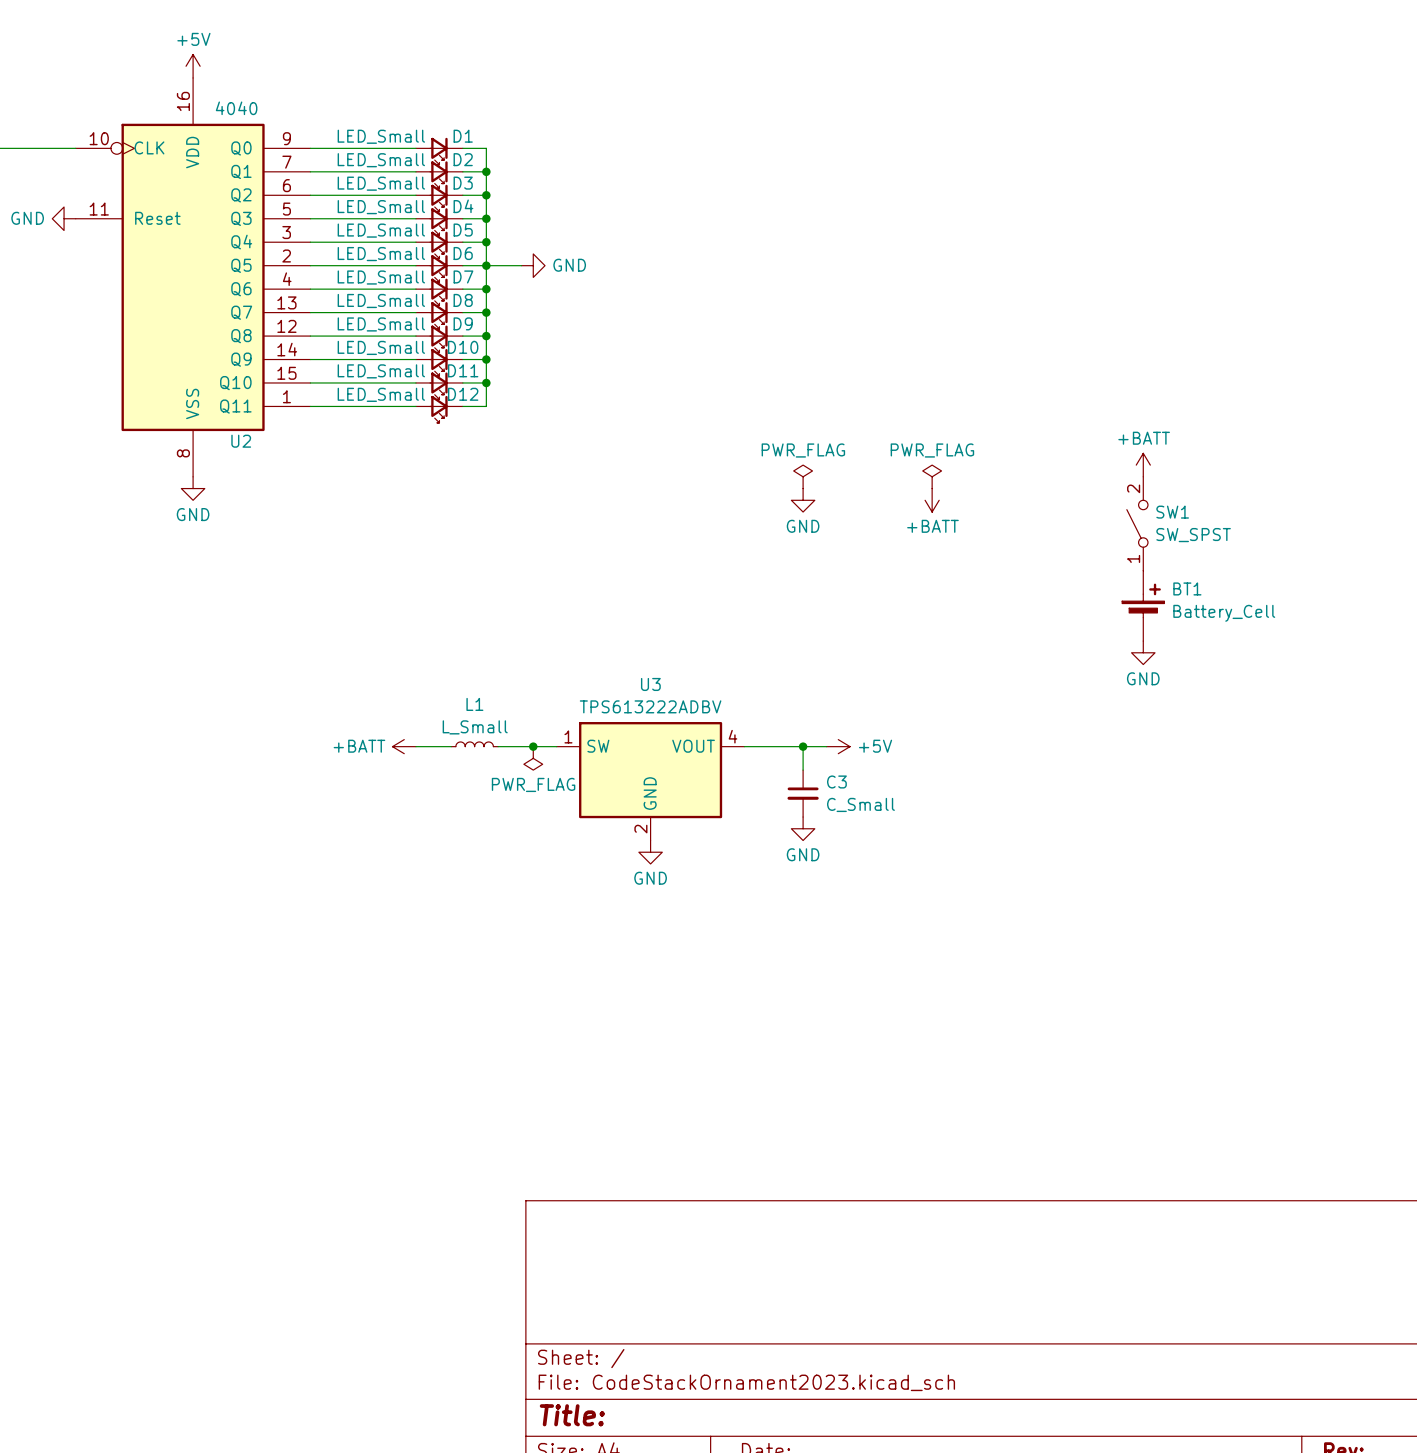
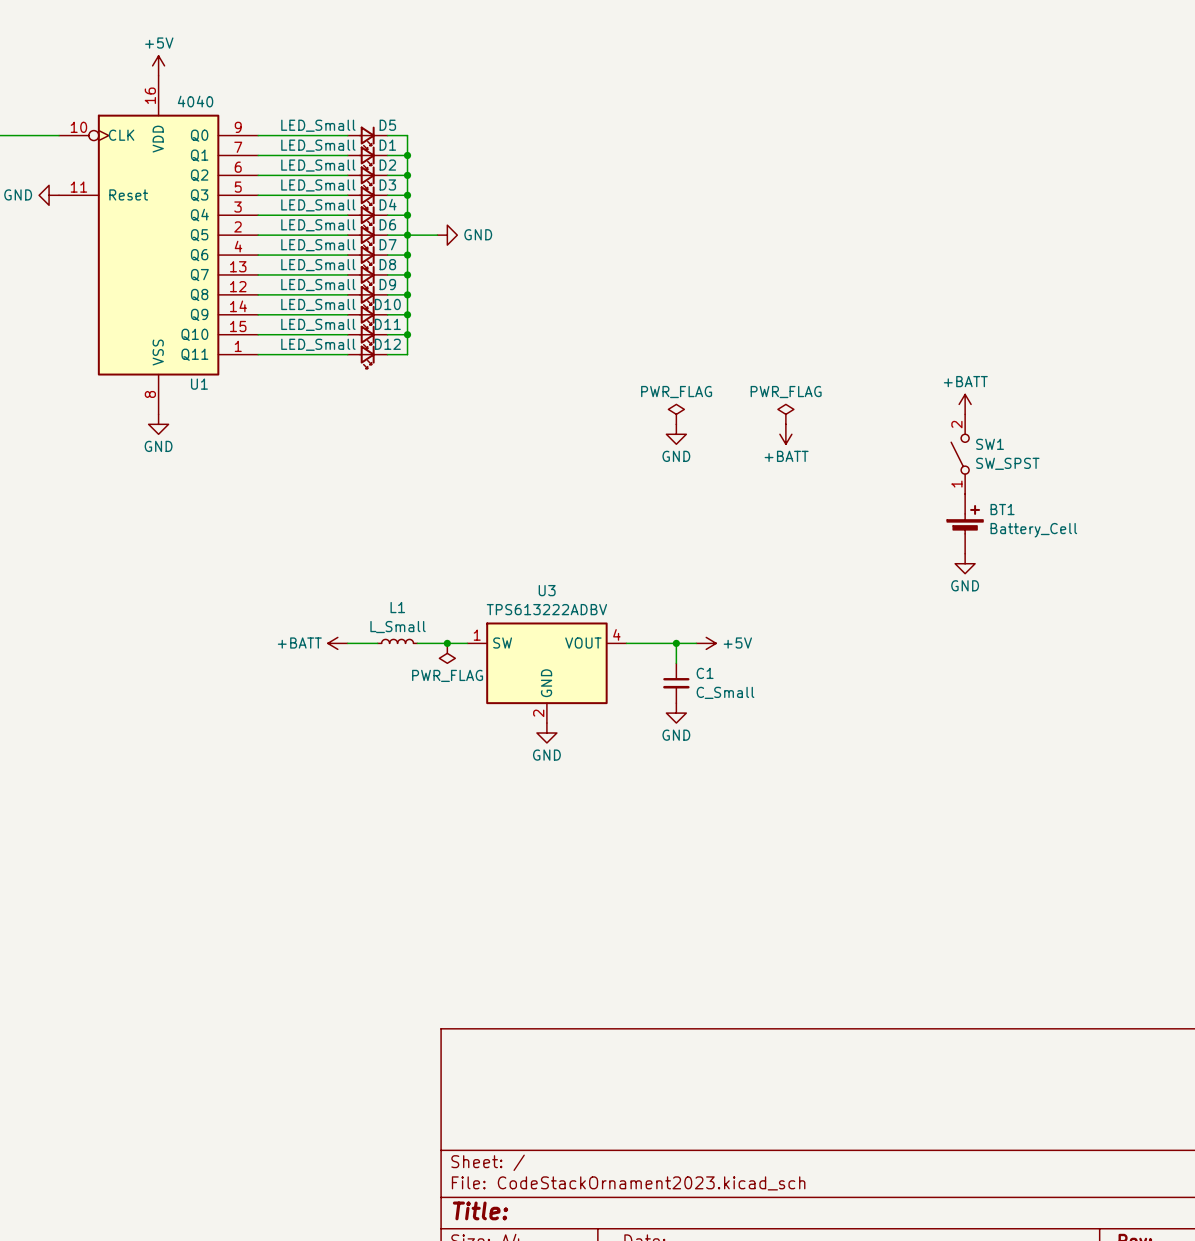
D1 name: D1 (463, 136) -> D5 (387, 125)
D2 name: D2 (463, 159) -> D1 (387, 145)
D3 name: D3 (463, 183) -> D2 (387, 165)
D4 name: D4 (463, 206) -> D3 (387, 184)
D5 name: D5 (463, 230) -> D4 (388, 204)
U2 name: U2 (241, 441) -> U1 (199, 384)
C3 name: C3 (836, 781) -> C1 (705, 673)

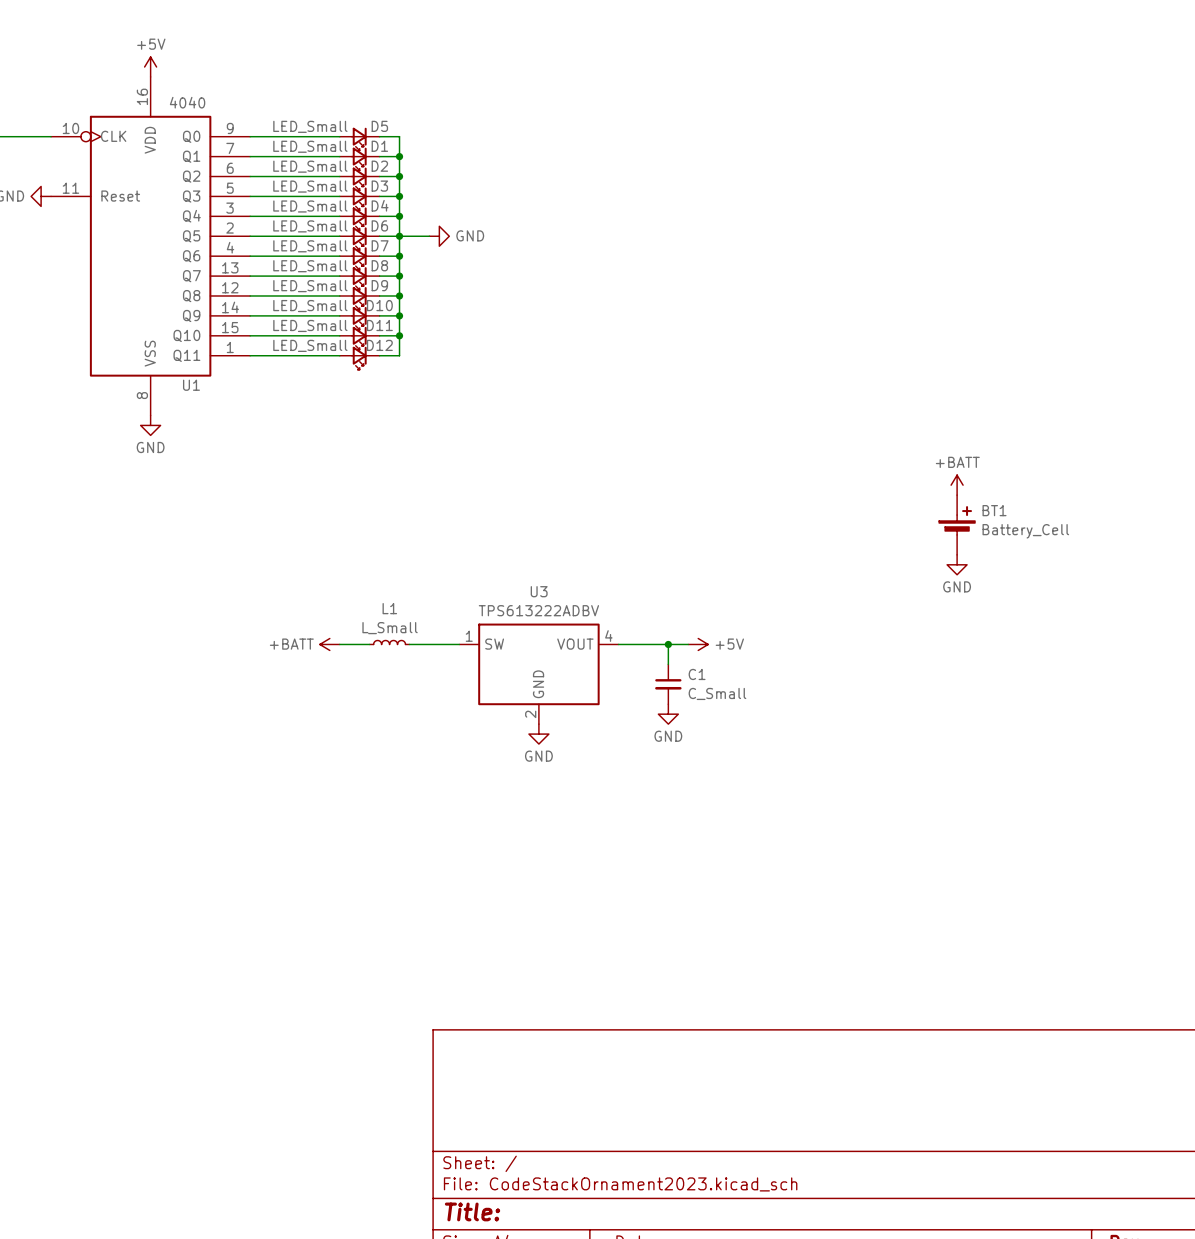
power symbol position: +BATT (965, 404) -> +BATT (957, 485)
power symbol: PWR_FLAG (676, 414) -> none
power symbol: PWR_FLAG (785, 414) -> none
power symbol: GND (676, 434) -> none
power symbol: +BATT (785, 434) -> none
SW1: SW_SPST (960, 454) -> none
junction: (447, 643) -> none
power symbol: PWR_FLAG (447, 653) -> none

